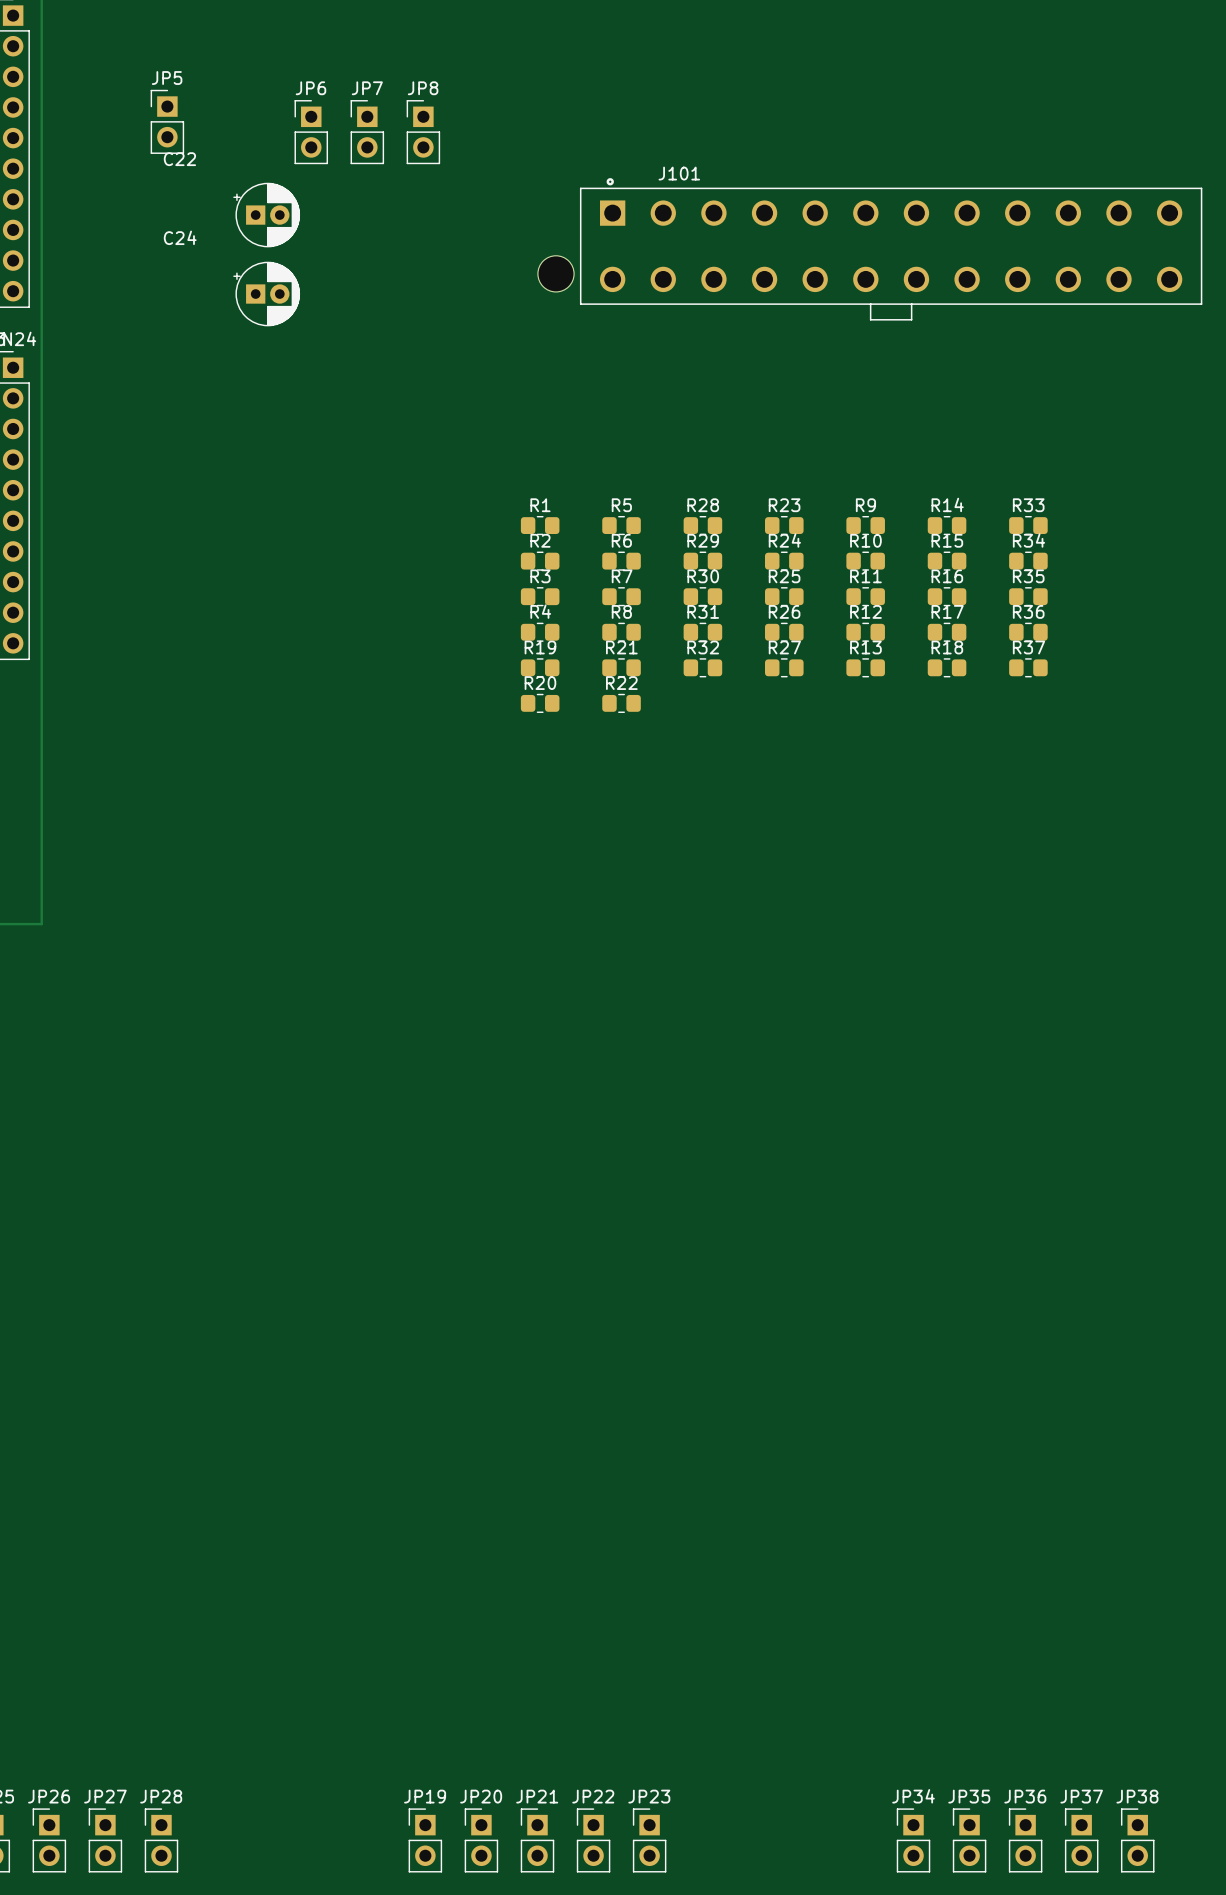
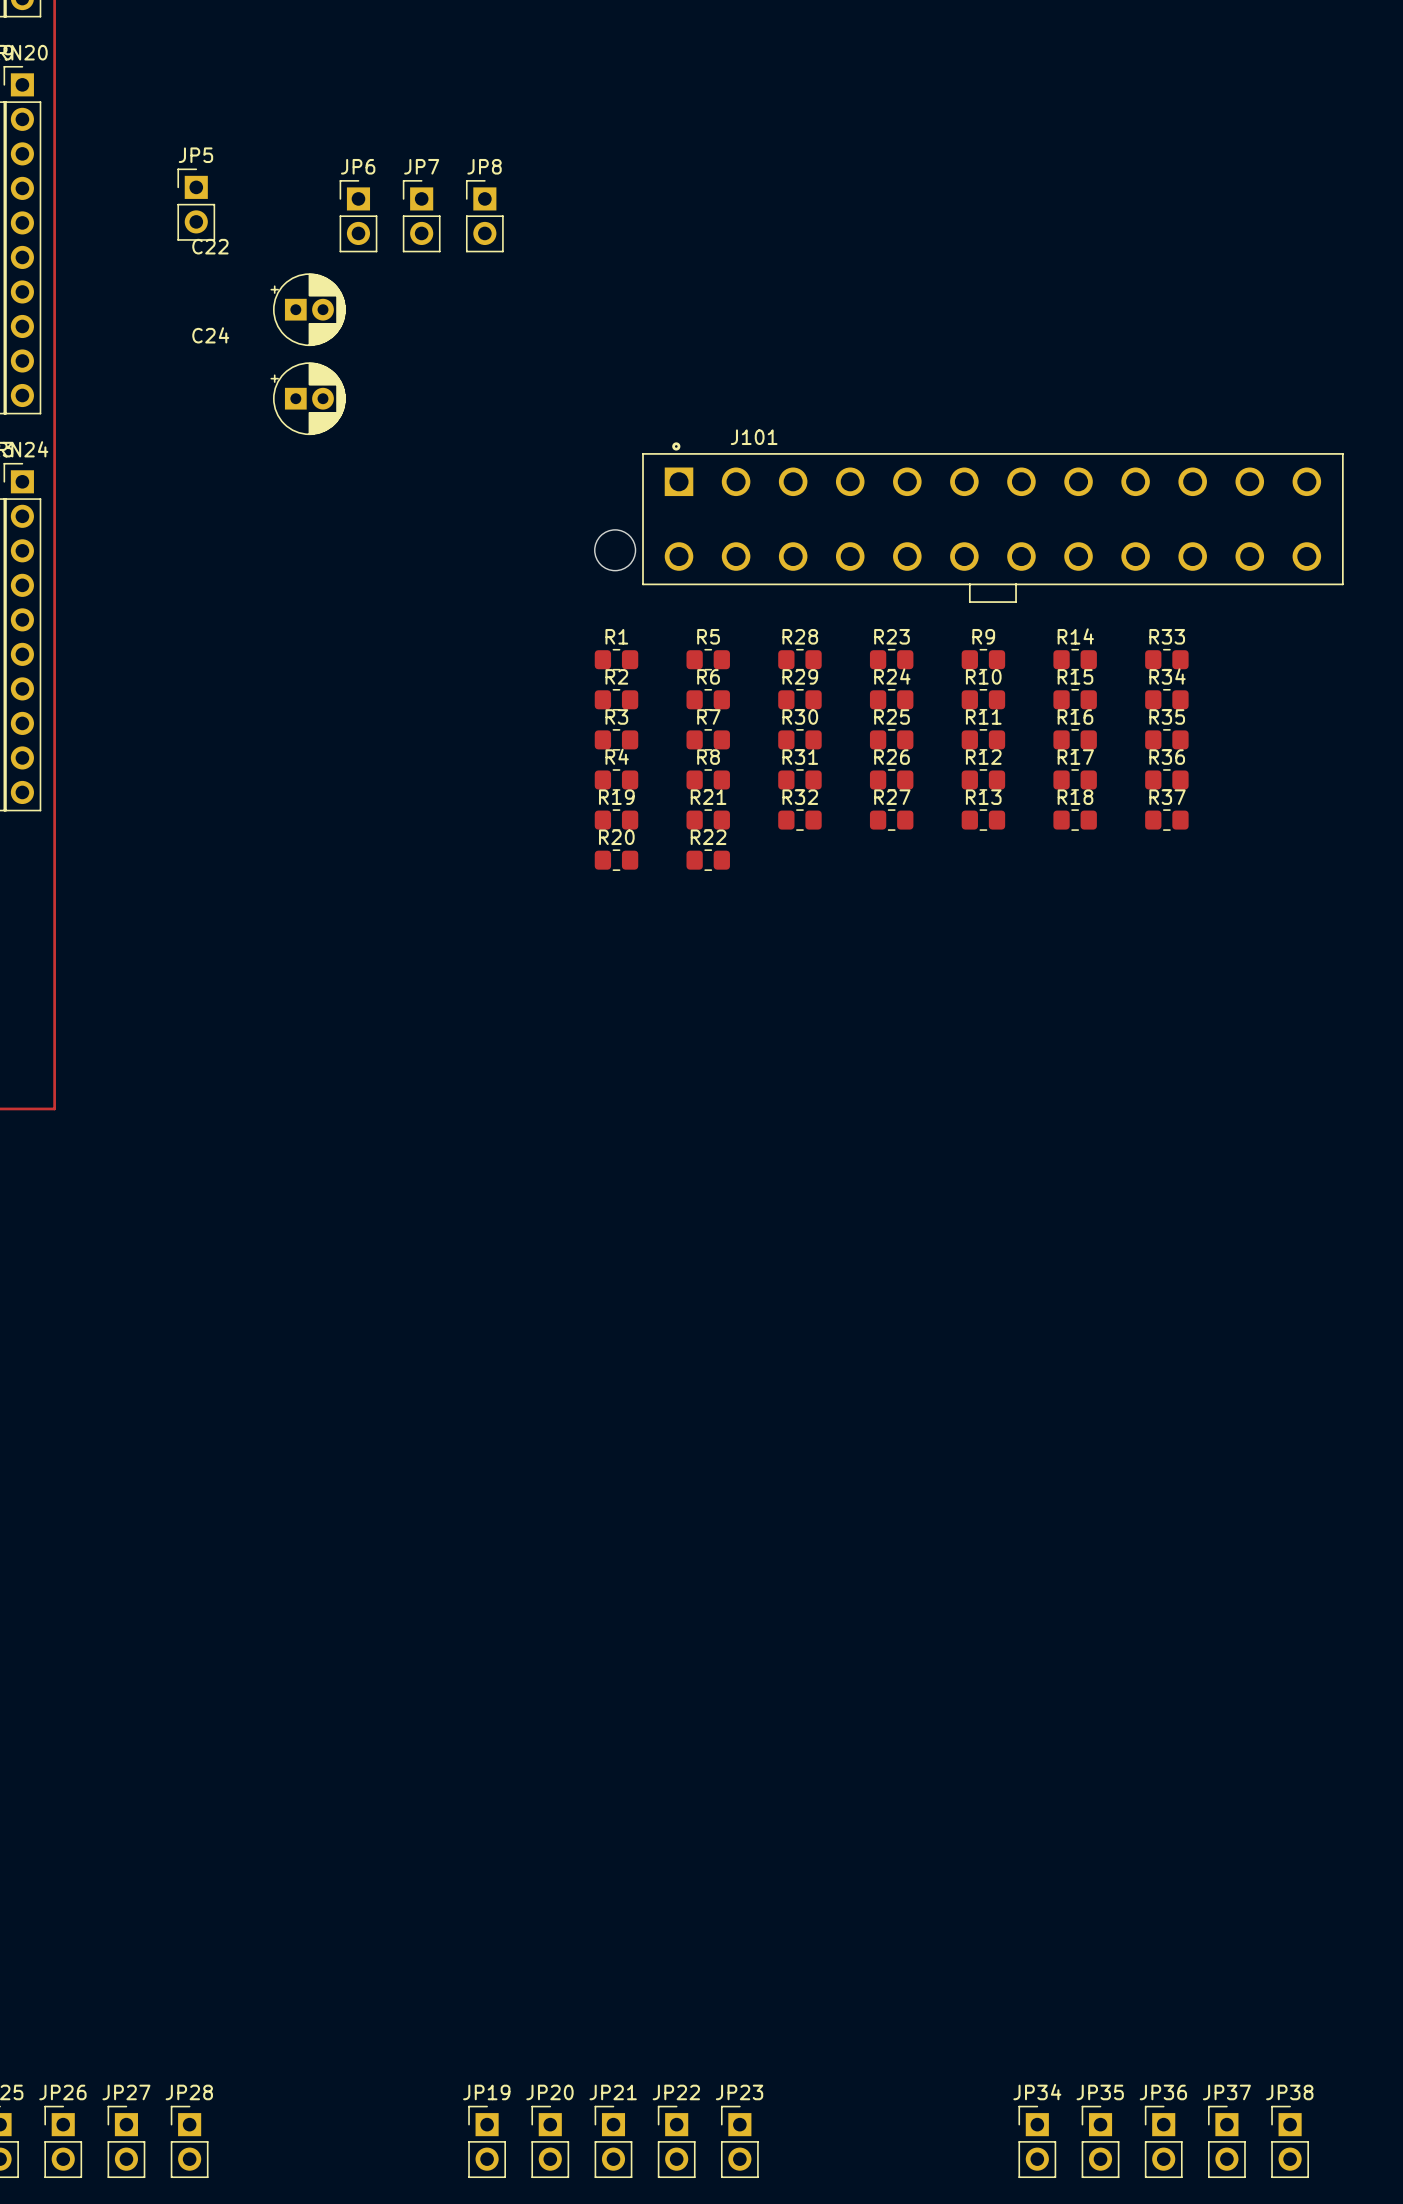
J101 position: (870, 249) -> (969, 522)

